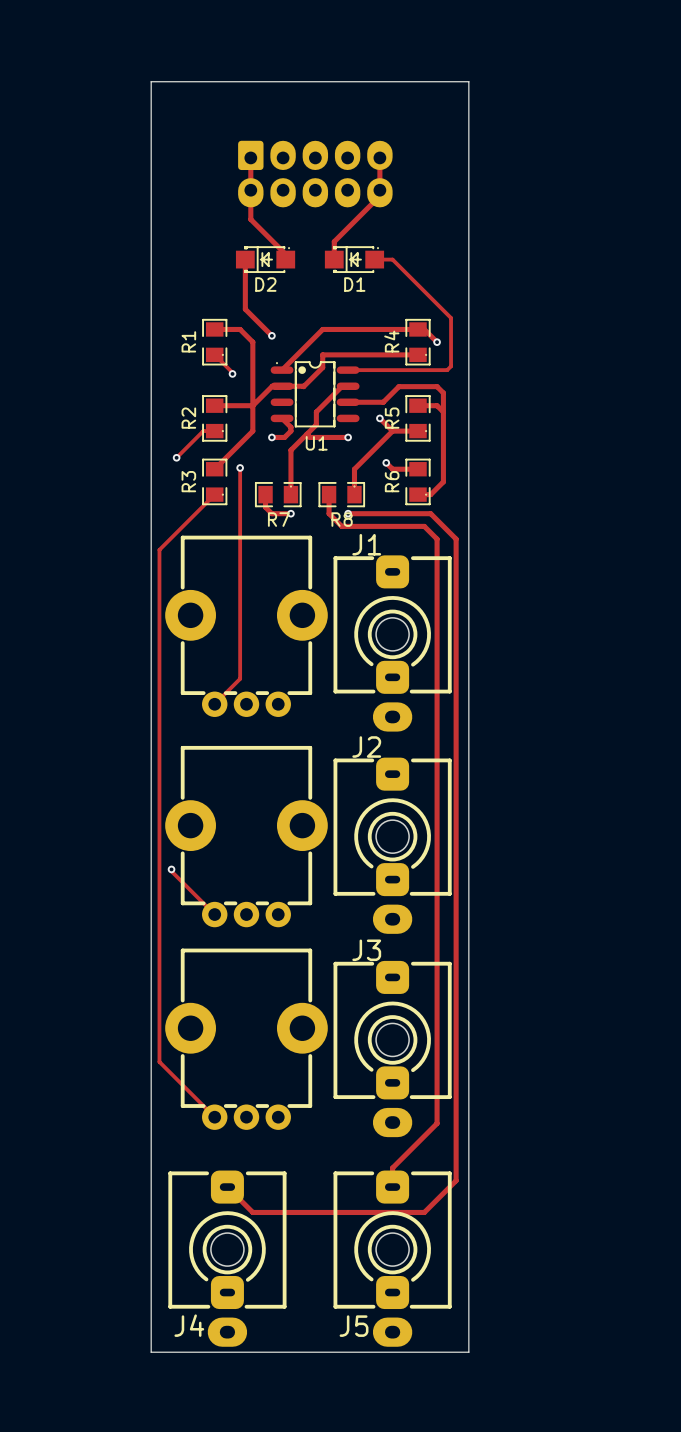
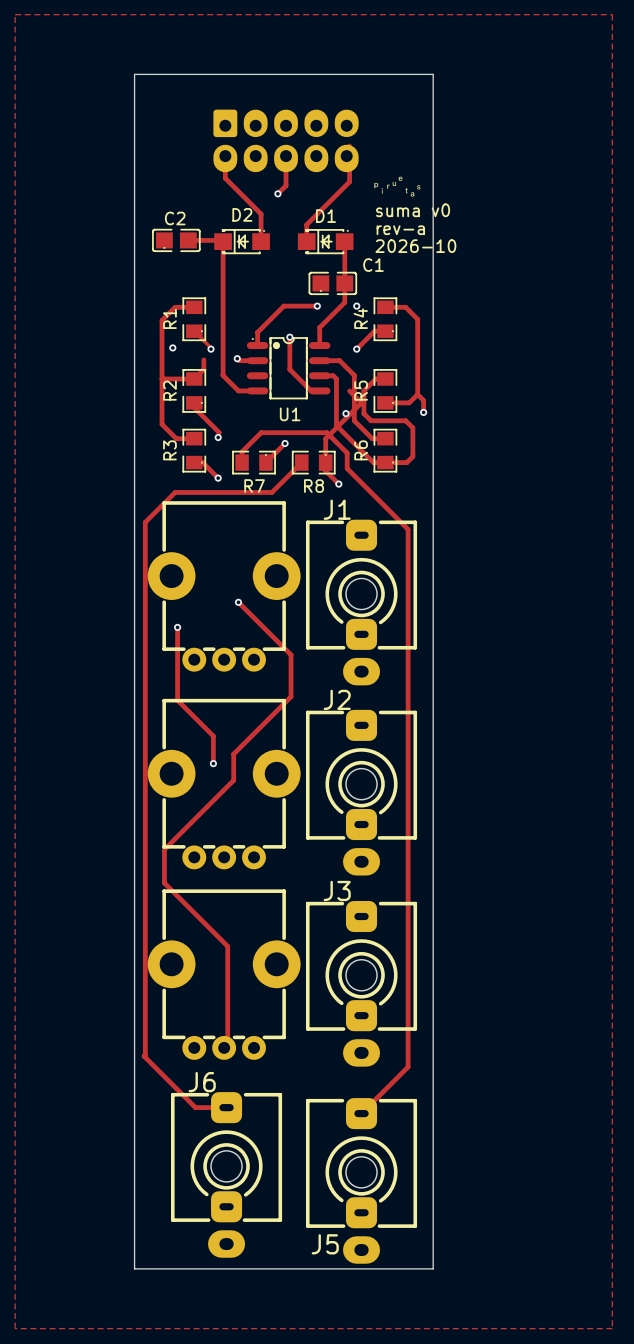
zone outline: none -> (15, 14) (612, 14) (612, 1328) (15, 1328) (15, 14)
track: (250, 157) (250, 219) (285, 254) -> (225, 156) (225, 178) (261, 214) (261, 236)
track: none -> (286, 156) (286, 185) (277, 193)
part position: (315, 174) -> (286, 140)
drawing: none -> [374, 176, 421, 197]
via: none -> (277, 193)
text: none -> suma v0 (413, 210)
text: none -> rev-a (400, 230)
C2: none -> (176, 240)
track: none -> (188, 240) (223, 241)
track: (374, 259) (392, 259) (451, 318) (451, 366) (447, 370) (348, 370) -> (344, 241) (344, 302) (319, 327) (319, 345)
text: none -> 2026-10 (415, 246)
D2 name position: D2 (265, 284) -> D2 (242, 214)
D1 name position: D1 (354, 284) -> D1 (325, 216)
C1: none -> (332, 283)
track: (245, 309) (271, 335) -> (223, 288) (223, 375)
via: none -> (317, 306)
via: none -> (356, 306)
track: (214, 329) (240, 329) (252, 342) (252, 431) (214, 469) -> (194, 307) (175, 307) (162, 320) (162, 424) (176, 438) (194, 438)
track: (418, 329) (322, 329) (282, 370) -> (317, 306) (283, 306) (257, 332) (257, 345)
track: (424, 329) (437, 342) -> (391, 307) (405, 307) (417, 319) (417, 394)
via: (271, 335) -> none
via: (437, 342) -> none
track: (406, 354) (322, 354) (322, 367) (303, 386) (282, 386) -> (374, 331) (356, 349)
track: none -> (289, 337) (289, 369) (311, 390) (319, 390)
via: none -> (289, 337)
via: none -> (172, 347)
via: none -> (356, 349)
via: none -> (237, 358)
track: none -> (203, 359) (203, 369) (194, 378) (162, 378)
track: (272, 386) (252, 405) (214, 405) -> (248, 360) (239, 360) (237, 358)
track: (348, 386) (342, 386) (316, 412) (316, 424) (290, 450) (290, 494) -> (285, 443) (265, 462)
track: (362, 402) (383, 402) (398, 386) (437, 386) (443, 392) (443, 481) (430, 494) -> (333, 375) (336, 378) (336, 425) (373, 462) (385, 462)
track: (418, 405) (437, 405) (443, 412) -> (385, 378) (375, 378) (363, 390) (363, 413) (371, 420) (405, 420) (412, 427) (412, 456) (406, 462) (397, 462)
track: (282, 418) (290, 427) (290, 431) (284, 437) (271, 437) -> (257, 390) (238, 390) (222, 375)
via: (379, 418) -> none
track: none -> (417, 394) (423, 400) (423, 412)
track: (214, 431) (203, 431) (176, 457) -> (194, 402) (194, 407) (219, 432)
track: (392, 431) (418, 431) -> (417, 394) (409, 402) (385, 402)
track: (306, 434) (310, 437) (348, 437) -> none
via: (271, 437) -> none
via: (348, 437) -> none
via: none -> (423, 412)
via: none -> (345, 413)
via: (176, 457) -> none
track: (386, 462) (392, 469) (404, 469) -> (319, 360) (339, 360) (354, 375) (354, 420) (372, 438)
via: (386, 462) -> none
track: (240, 467) (240, 678) (214, 704) -> none
via: none -> (285, 443)
track: (214, 494) (159, 549) (159, 1061) (214, 1117) -> (194, 462) (202, 462) (218, 478)
track: (265, 494) (265, 507) (271, 513) (290, 513) -> (242, 462) (242, 451) (261, 432) (326, 432) (347, 453) (347, 468) (408, 529) (408, 1067) (367, 1107)
track: (329, 494) (329, 513) (341, 526) (424, 526) (437, 539) (437, 1123) (392, 1168) (392, 1187) -> (301, 462) (271, 492) (175, 492) (145, 522) (144, 1056) (195, 1107) (226, 1107)
track: none -> (325, 462) (325, 470) (338, 484)
via: none -> (218, 478)
via: (290, 513) -> none
track: (348, 513) (430, 513) (456, 539) (456, 1180) (424, 1212) (252, 1212) (227, 1187) -> none
via position: (348, 513) -> (338, 484)
track: none -> (238, 602) (291, 654) (291, 696) (233, 754) (233, 780) (164, 849) (164, 883) (227, 946) (227, 1047)
via: none -> (238, 602)
track: none -> (177, 627) (177, 700) (213, 736) (213, 763)
via: none -> (177, 627)
via: none -> (213, 763)
track: (171, 869) (214, 914) -> none
via: (171, 869) -> none
J6: none -> (226, 1174)
J4: (227, 1258) -> none

